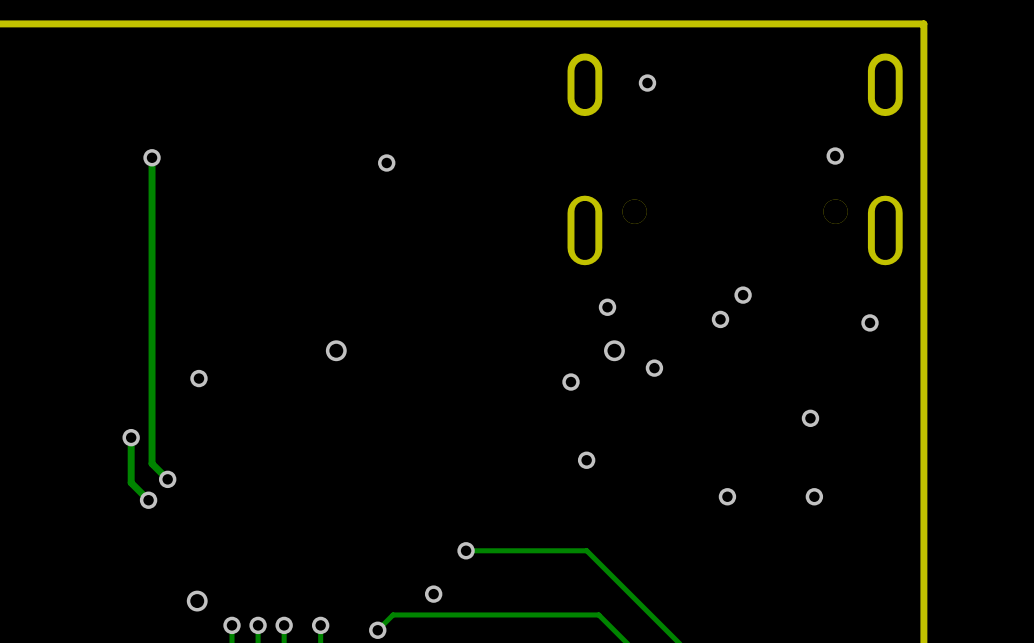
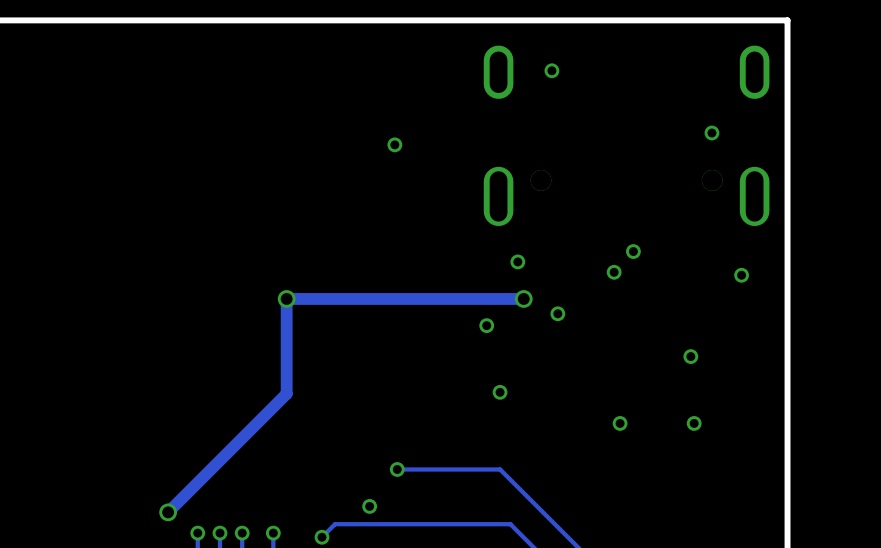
track: (152, 157) (152, 463) (167, 479) -> none
via: (152, 157) -> none
via position: (386, 162) -> (394, 144)
track: none -> (523, 298) (286, 298) (286, 393) (168, 512)
via: (198, 378) -> none
track: (131, 437) (131, 482) (148, 500) -> none
via: (131, 437) -> none
via: (167, 479) -> none
via: (148, 500) -> none

